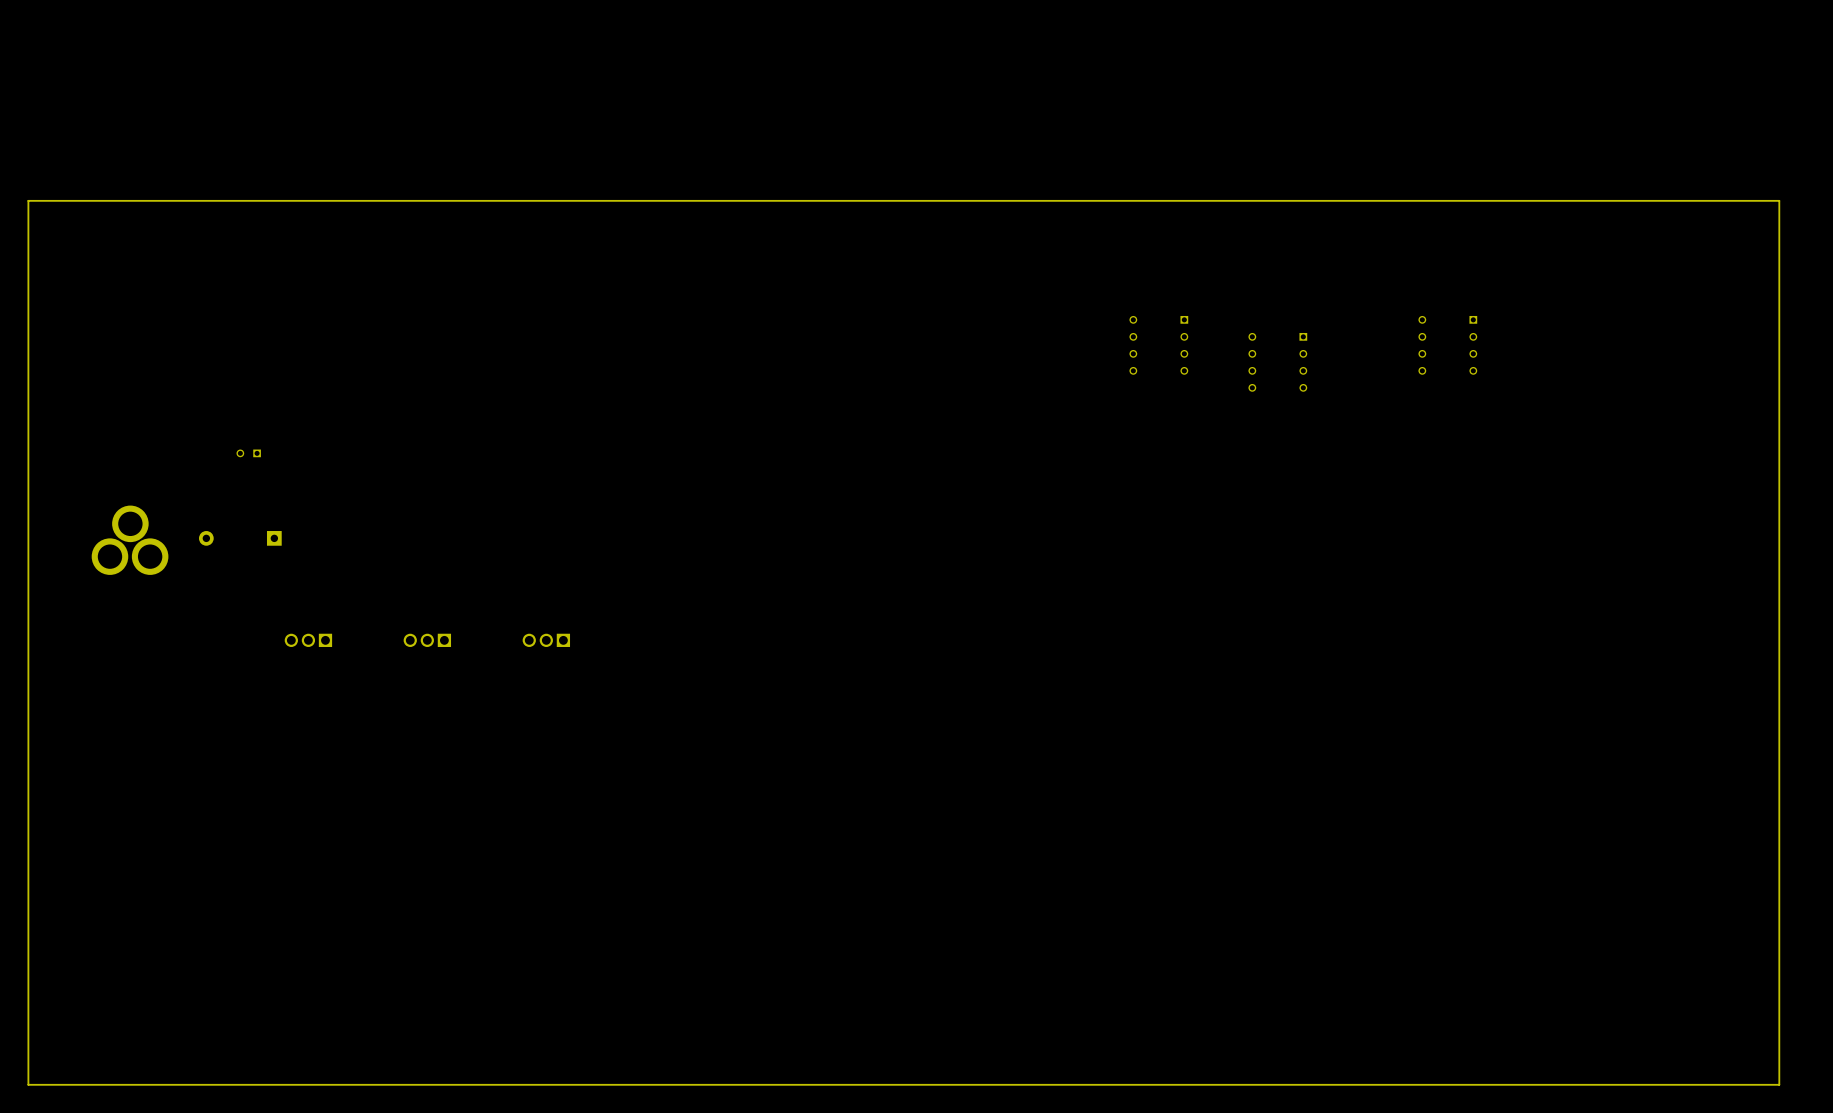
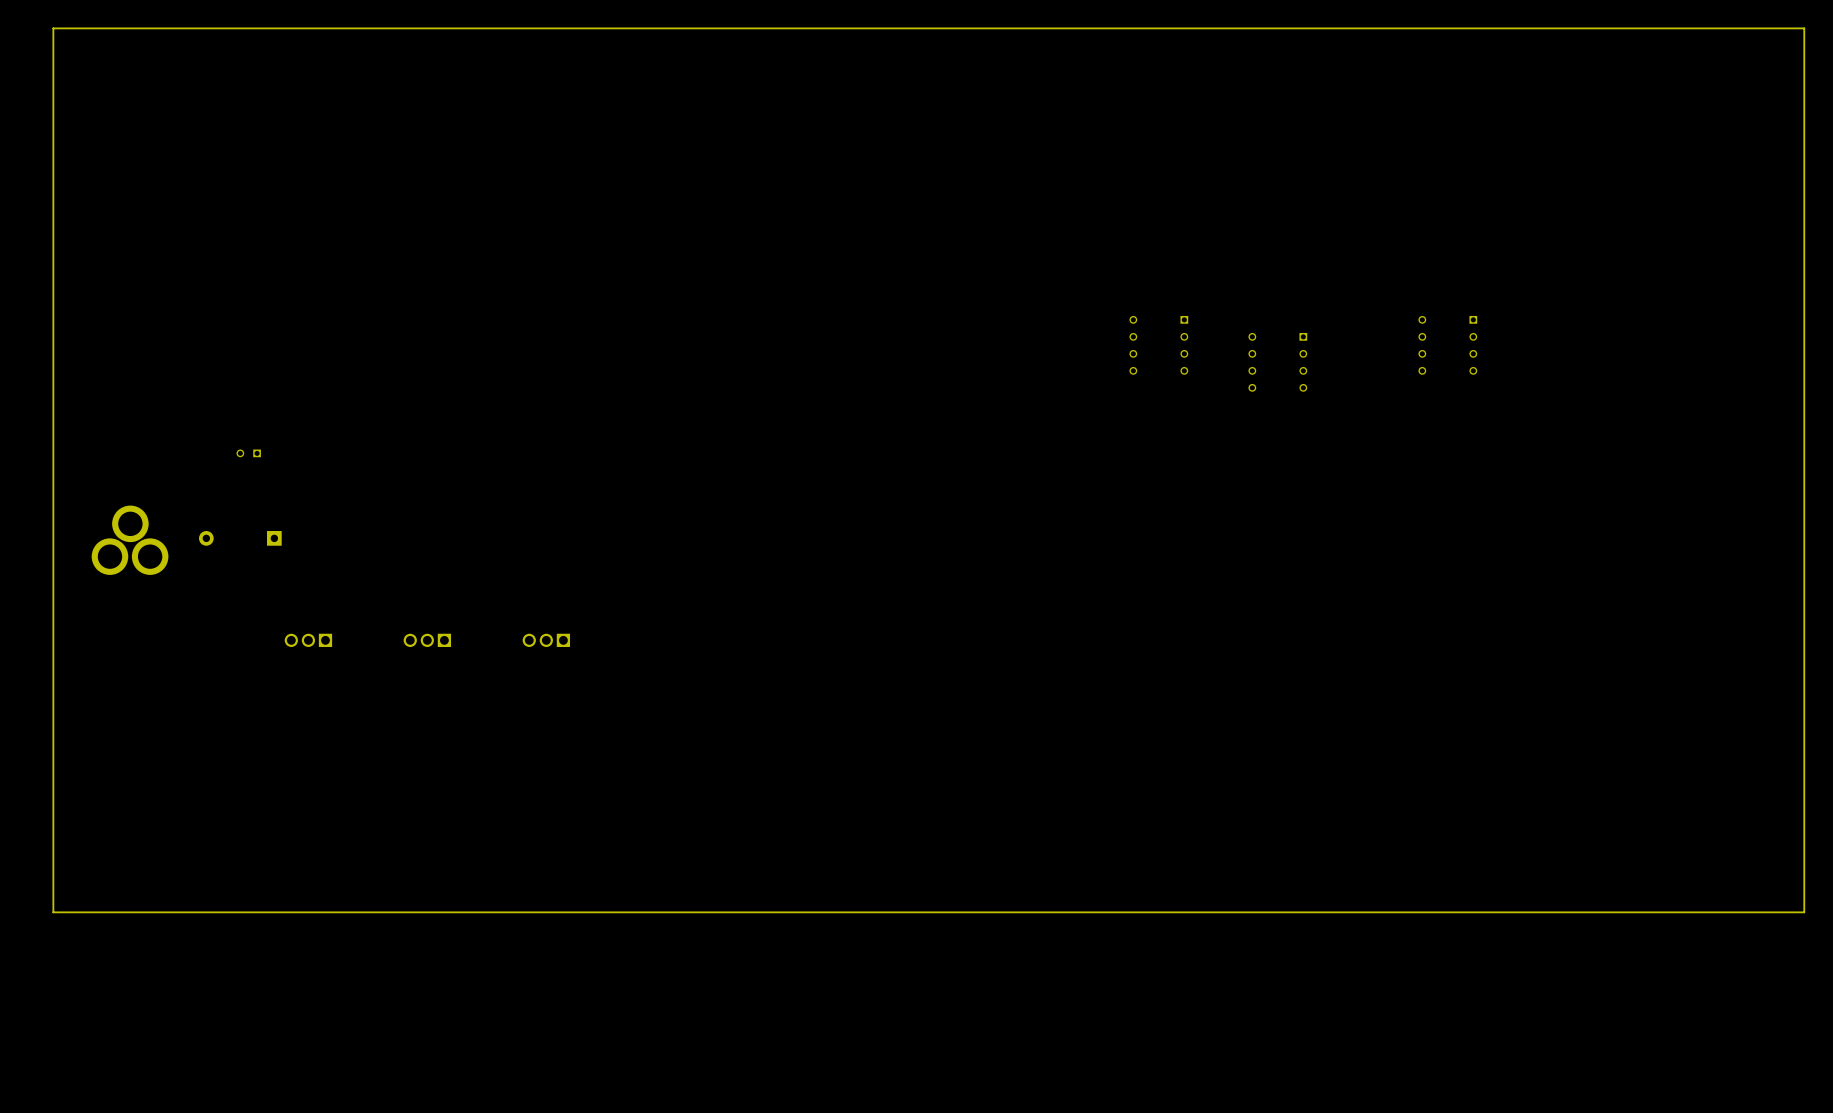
board edge: (1779, 200) (28, 200) (28, 1084) (1779, 1084) (1779, 200) -> (1804, 28) (53, 28) (53, 912) (1804, 912) (1804, 28)

